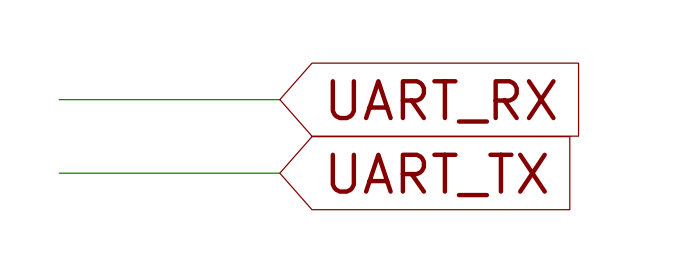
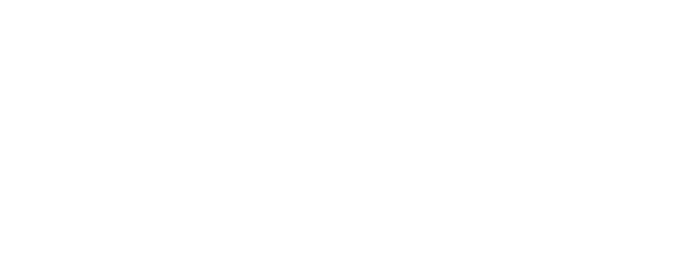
wire: (59, 99) (279, 99) -> none
global label: UART_RX (443, 101) -> none
wire: (59, 173) (279, 173) -> none
global label: UART_TX (438, 174) -> none

